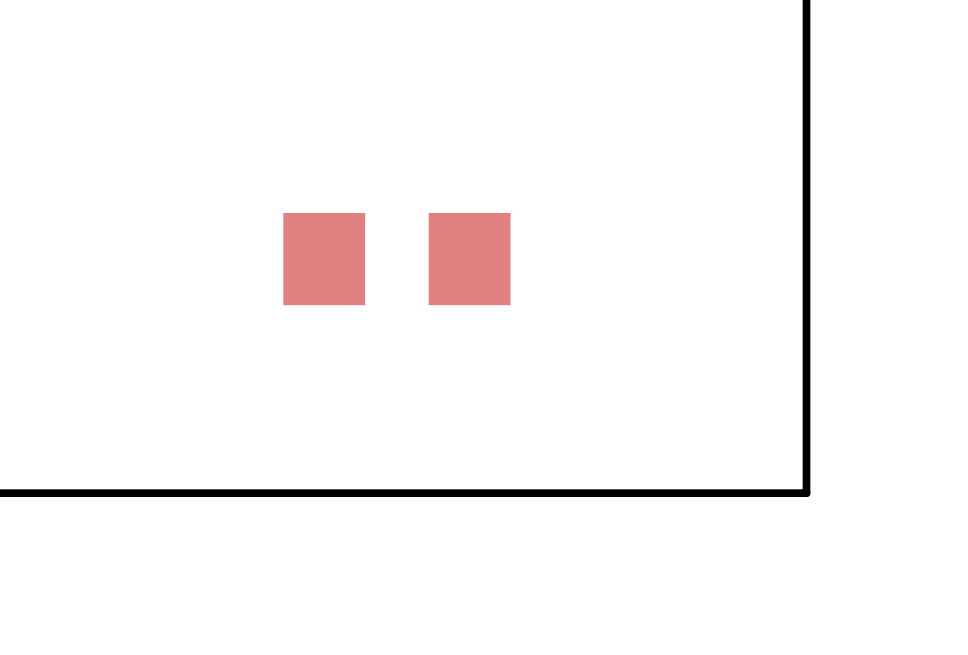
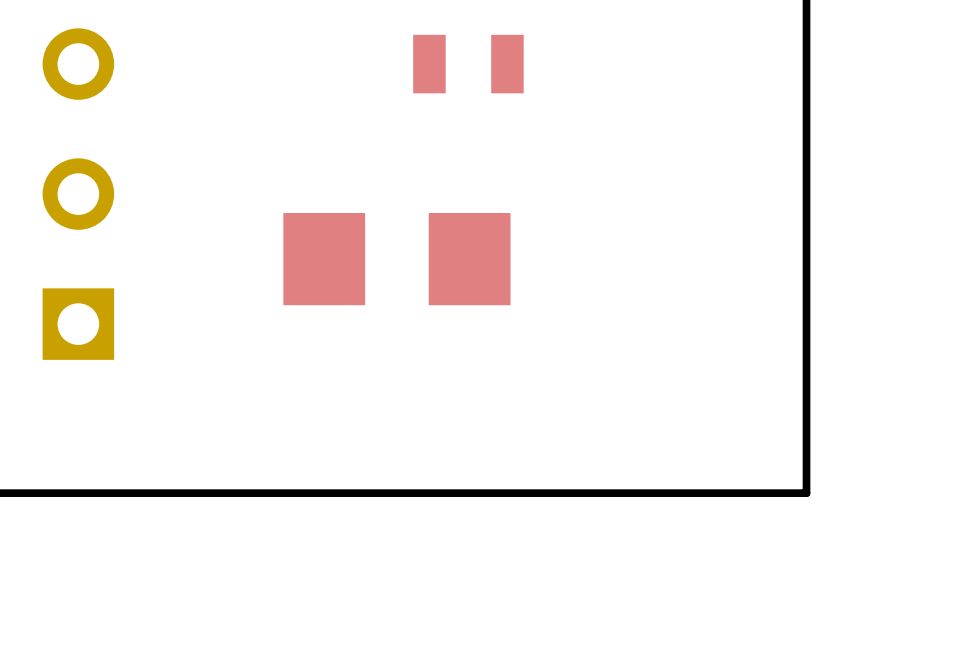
part: none -> (468, 64)
part: none -> (78, 194)

